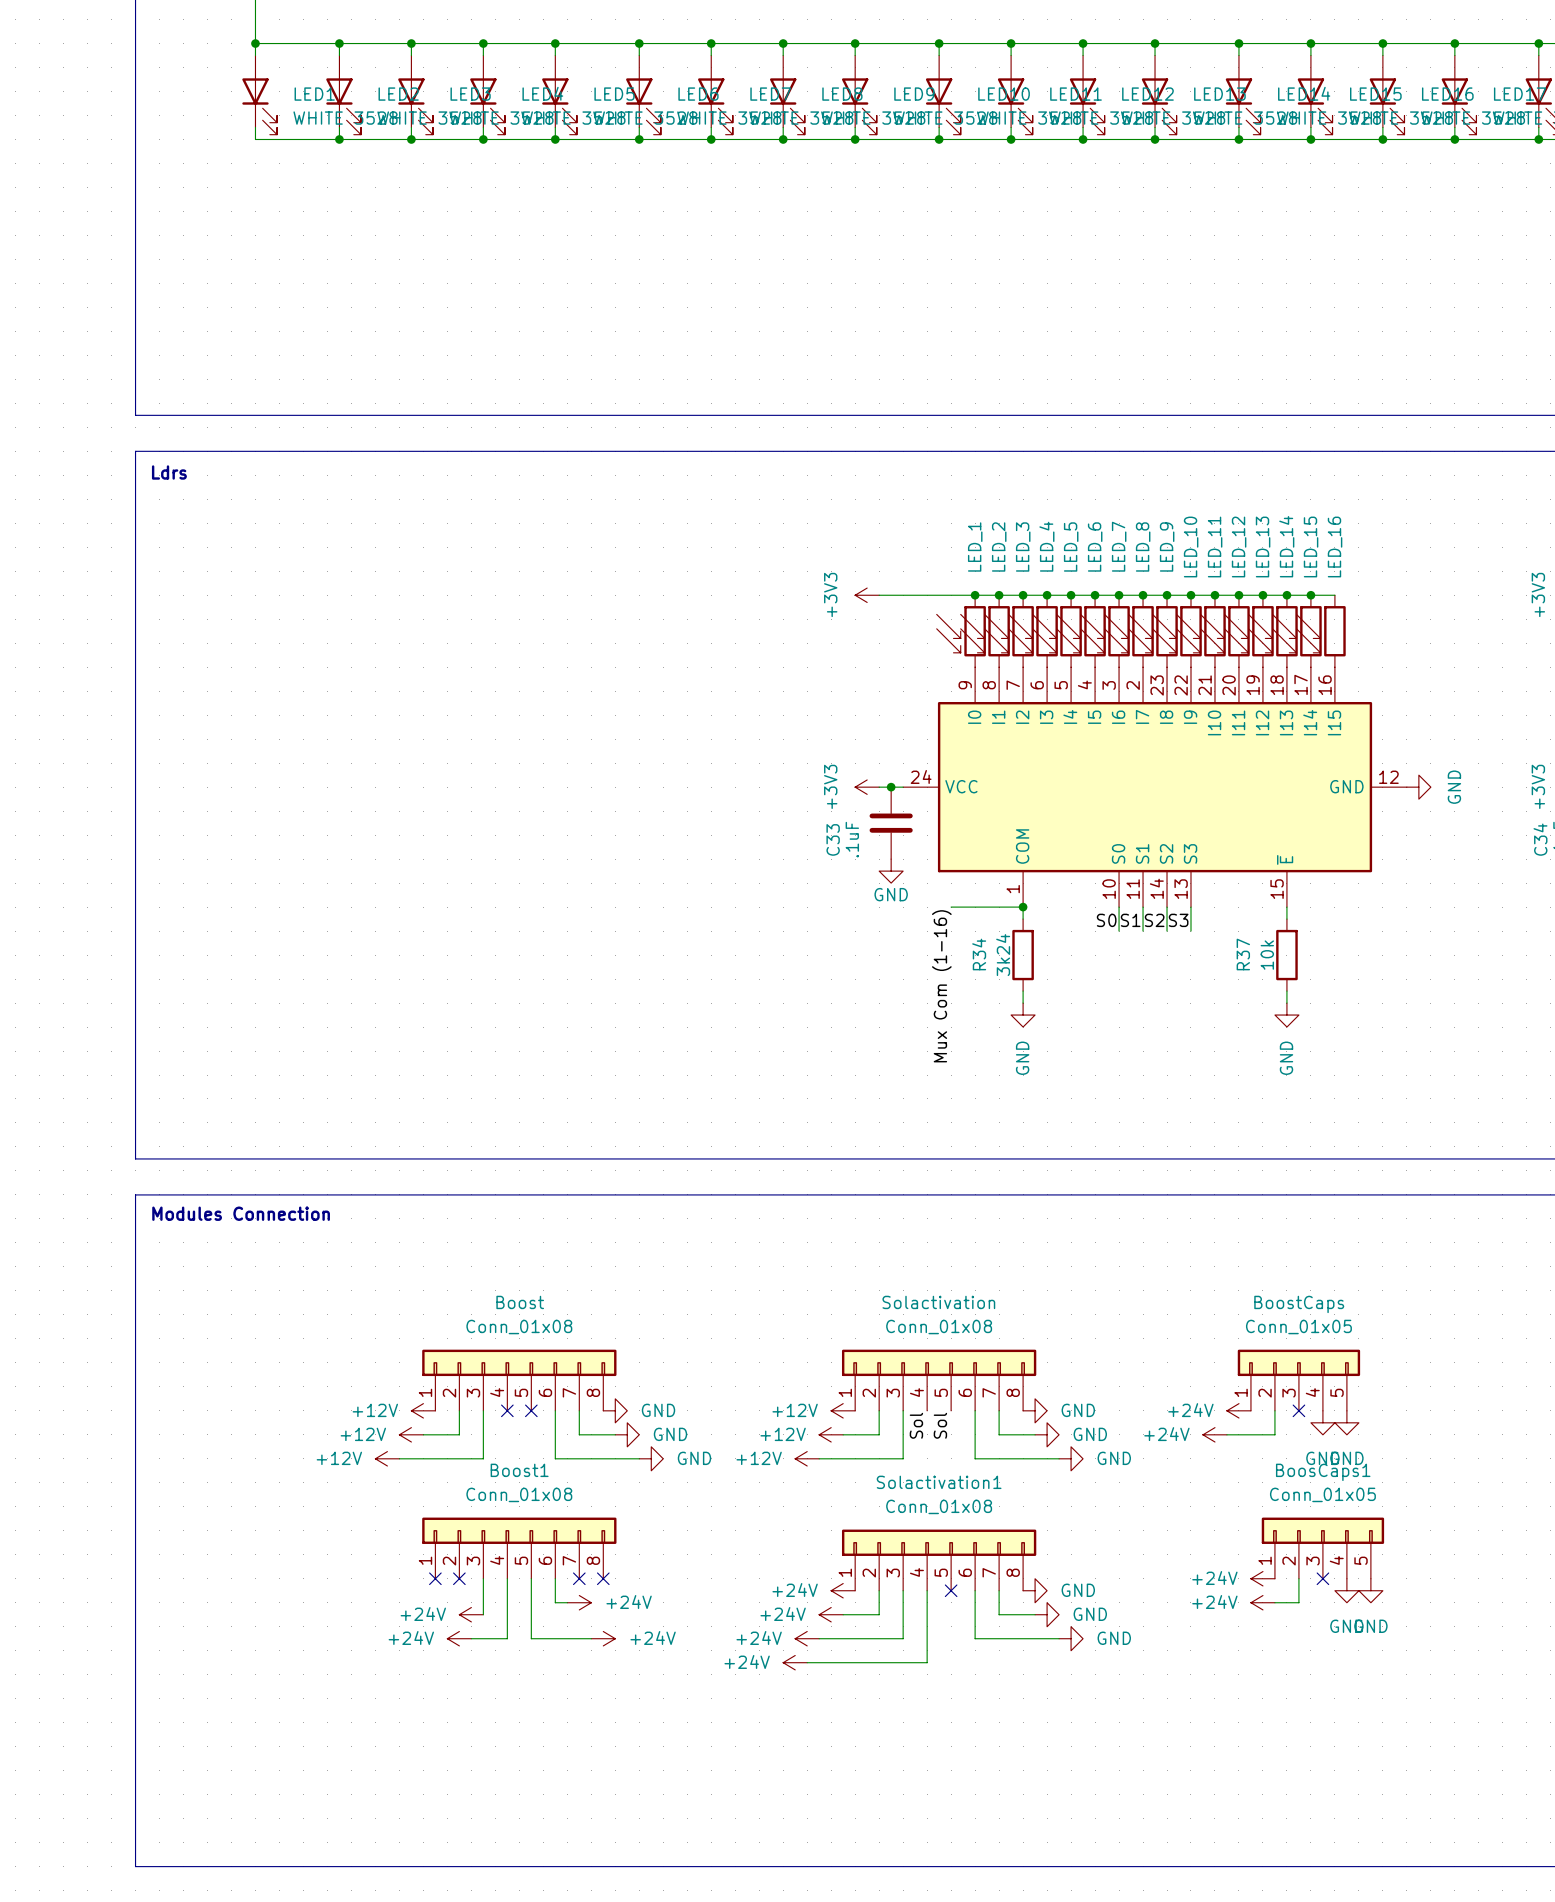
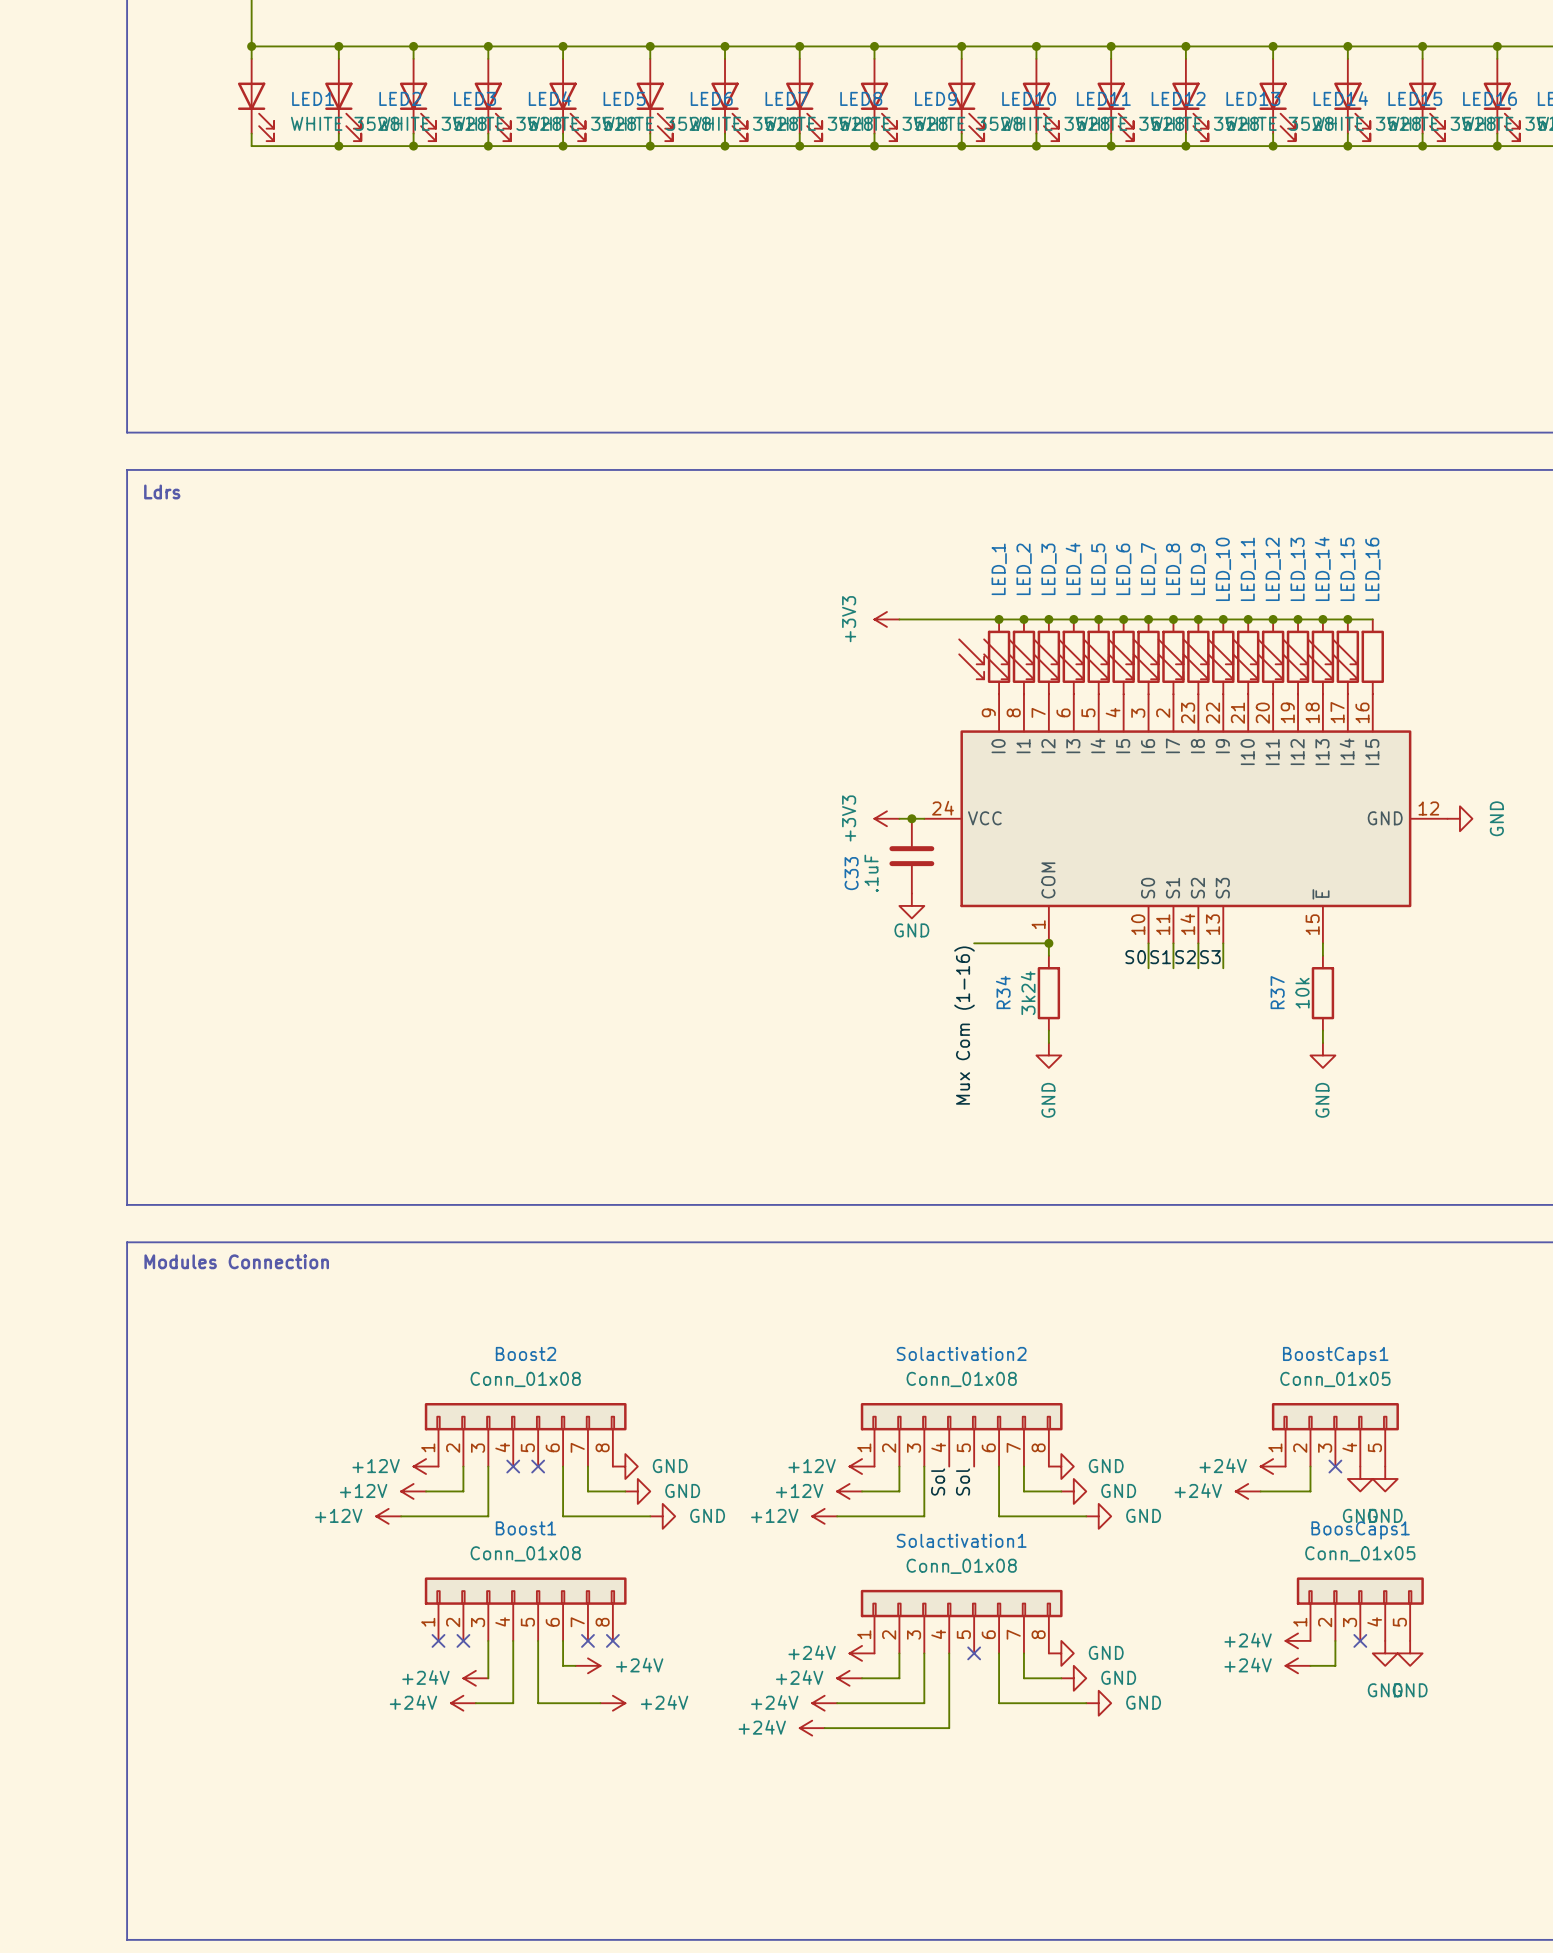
Boost name: Boost (520, 1302) -> Boost2 (525, 1353)
Solactivation name: Solactivation (938, 1302) -> Solactivation2 (961, 1353)
BoostCaps name: BoostCaps (1299, 1304) -> BoostCaps1 (1335, 1356)

